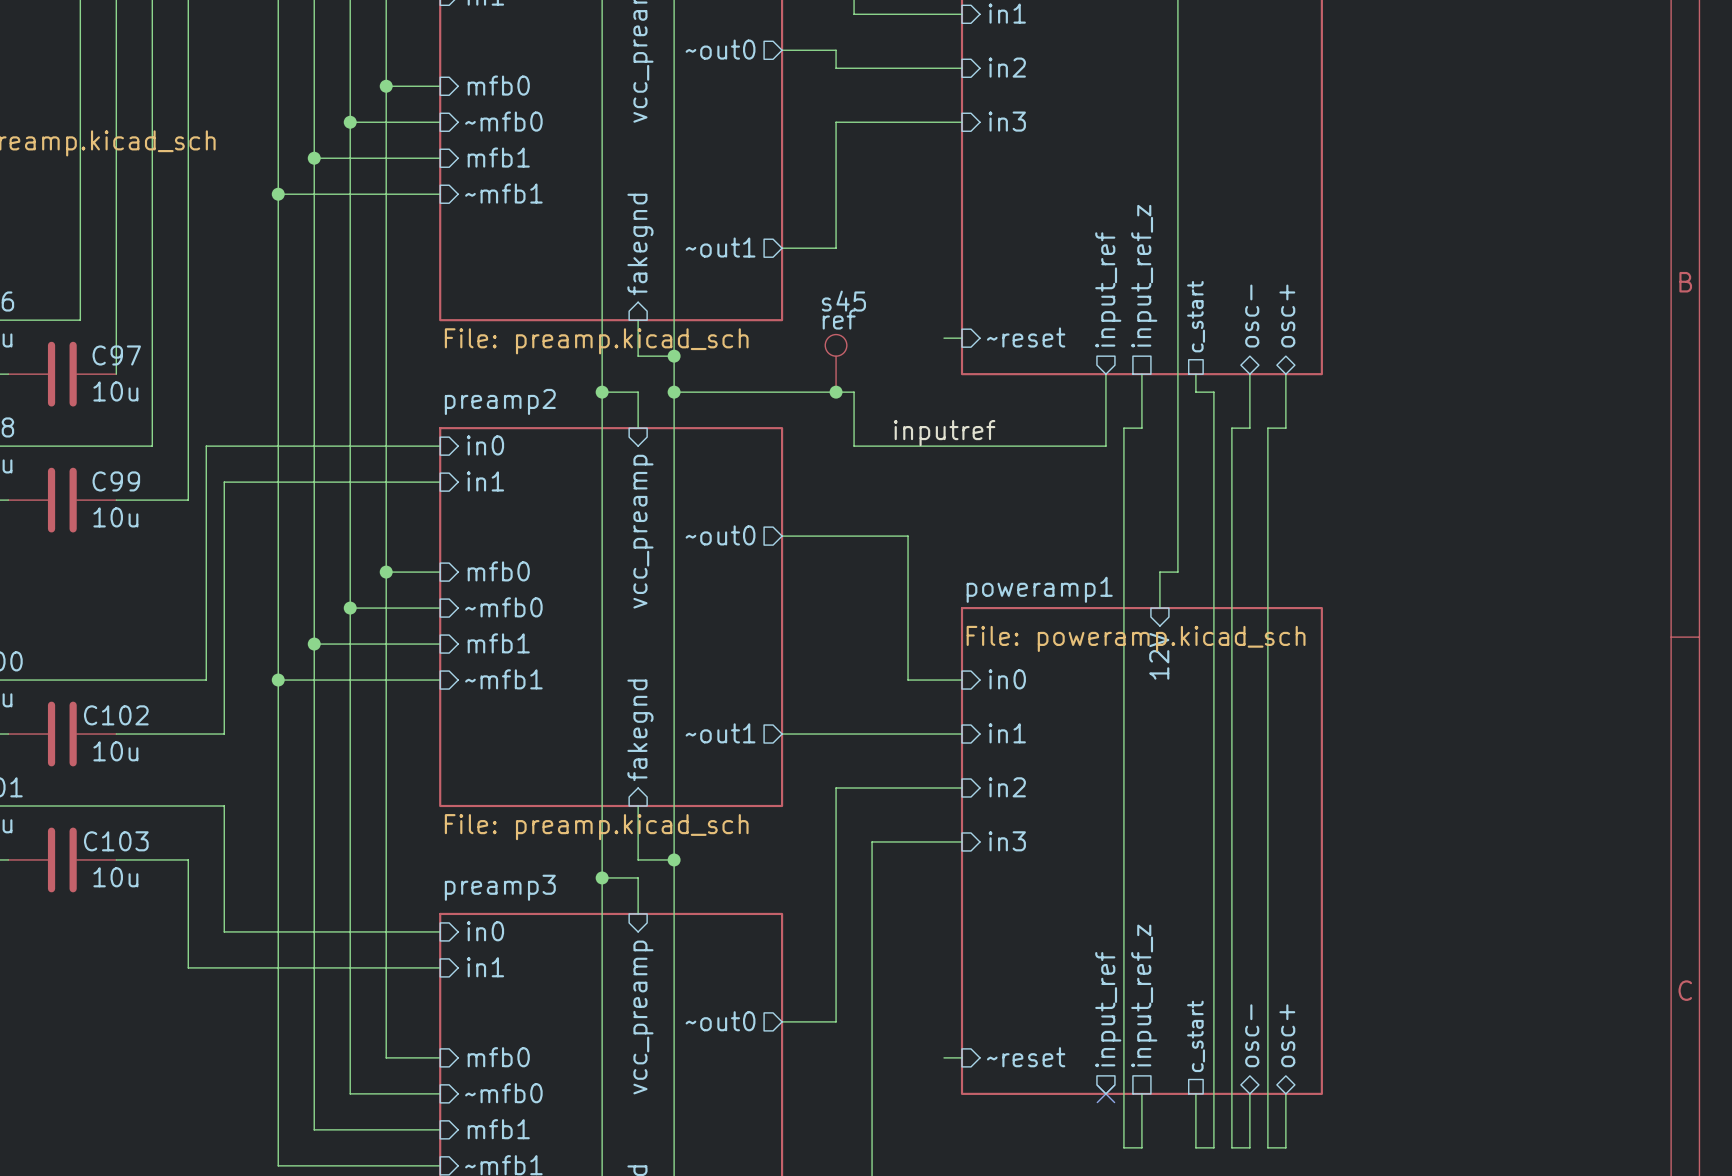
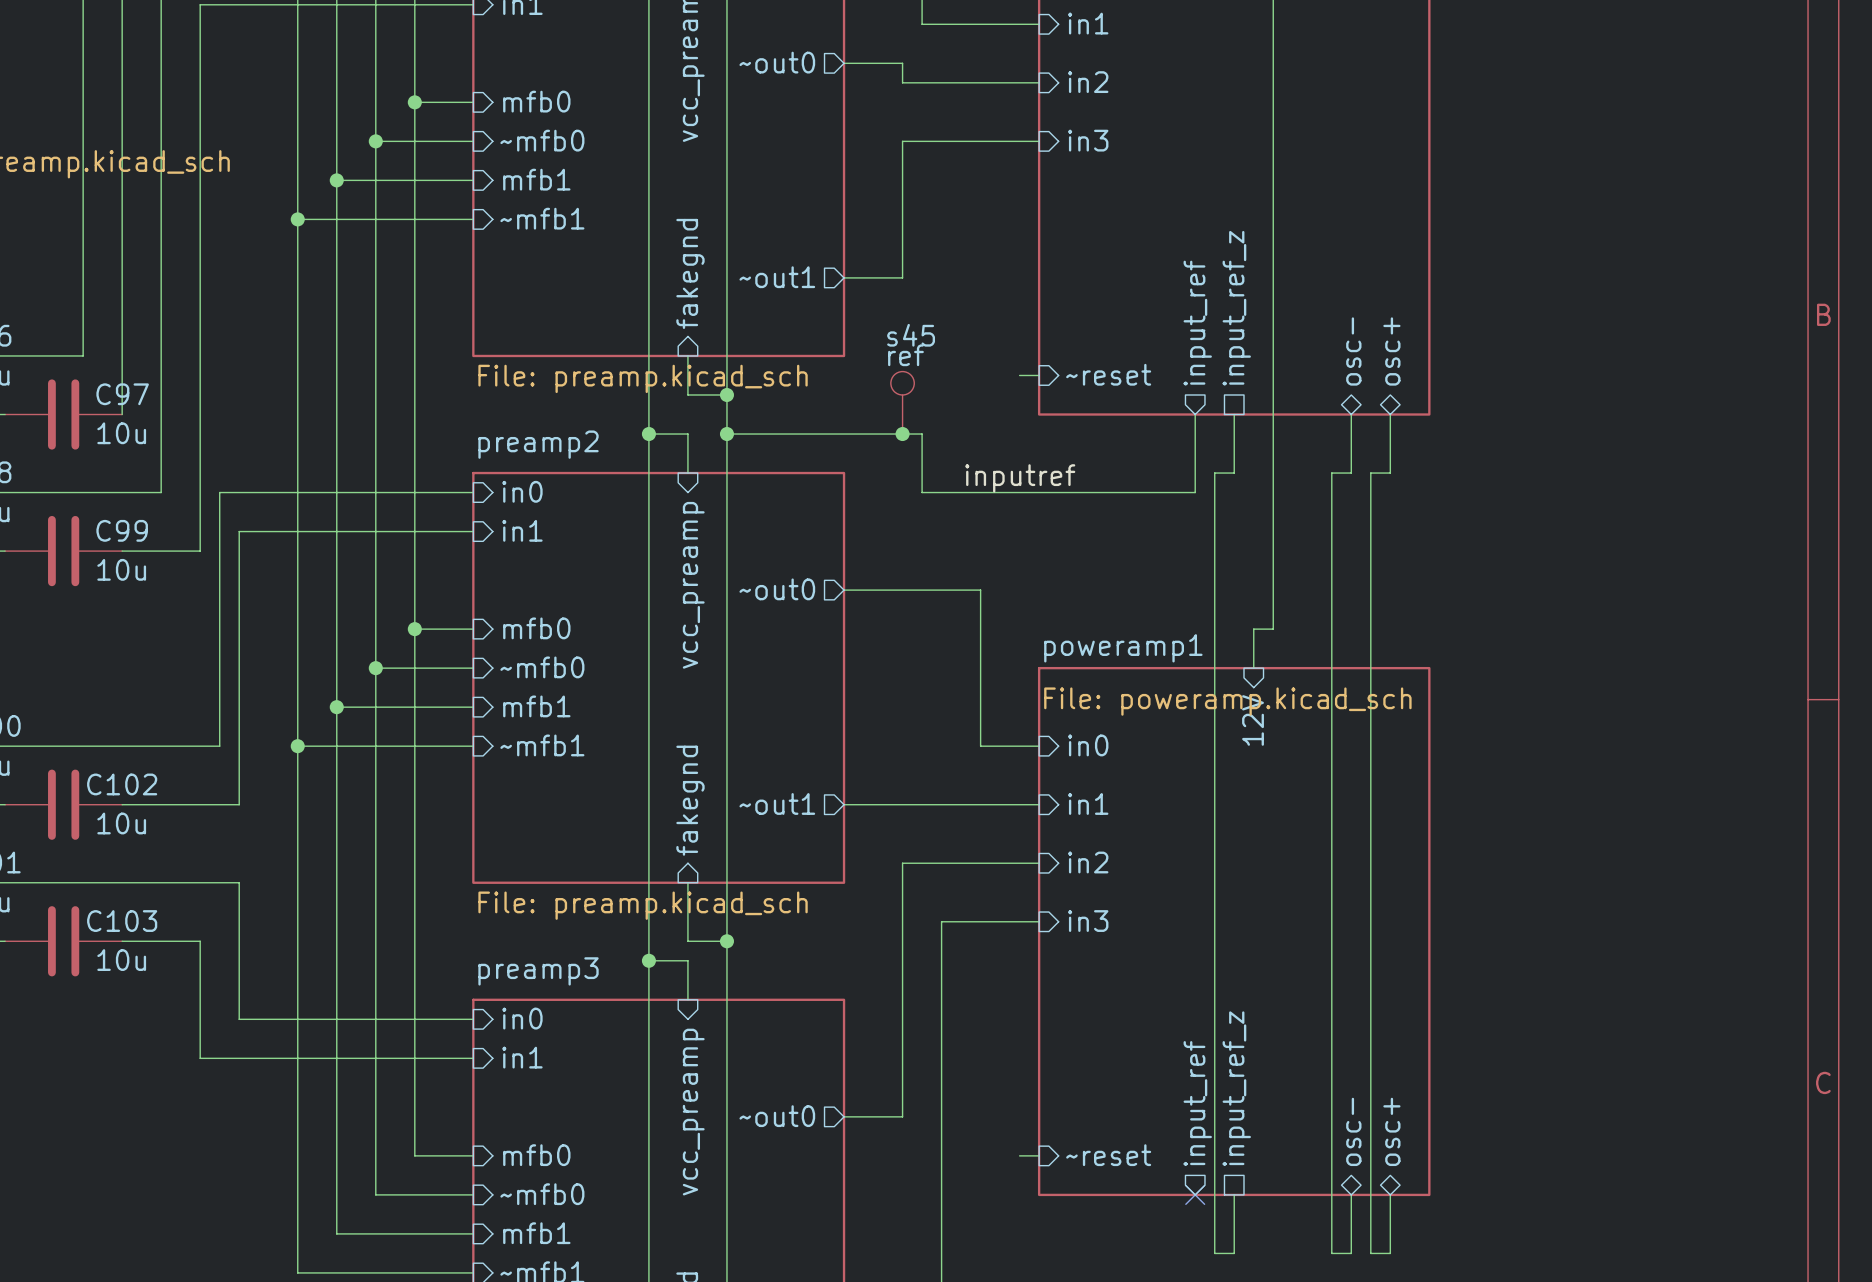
sheet pin: c_start (1196, 316) -> none
wire: (1195, 374) (1195, 392) (1213, 392) (1213, 1147) (1195, 1147) (1195, 1093) -> none
sheet pin: c_start (1196, 1036) -> none

